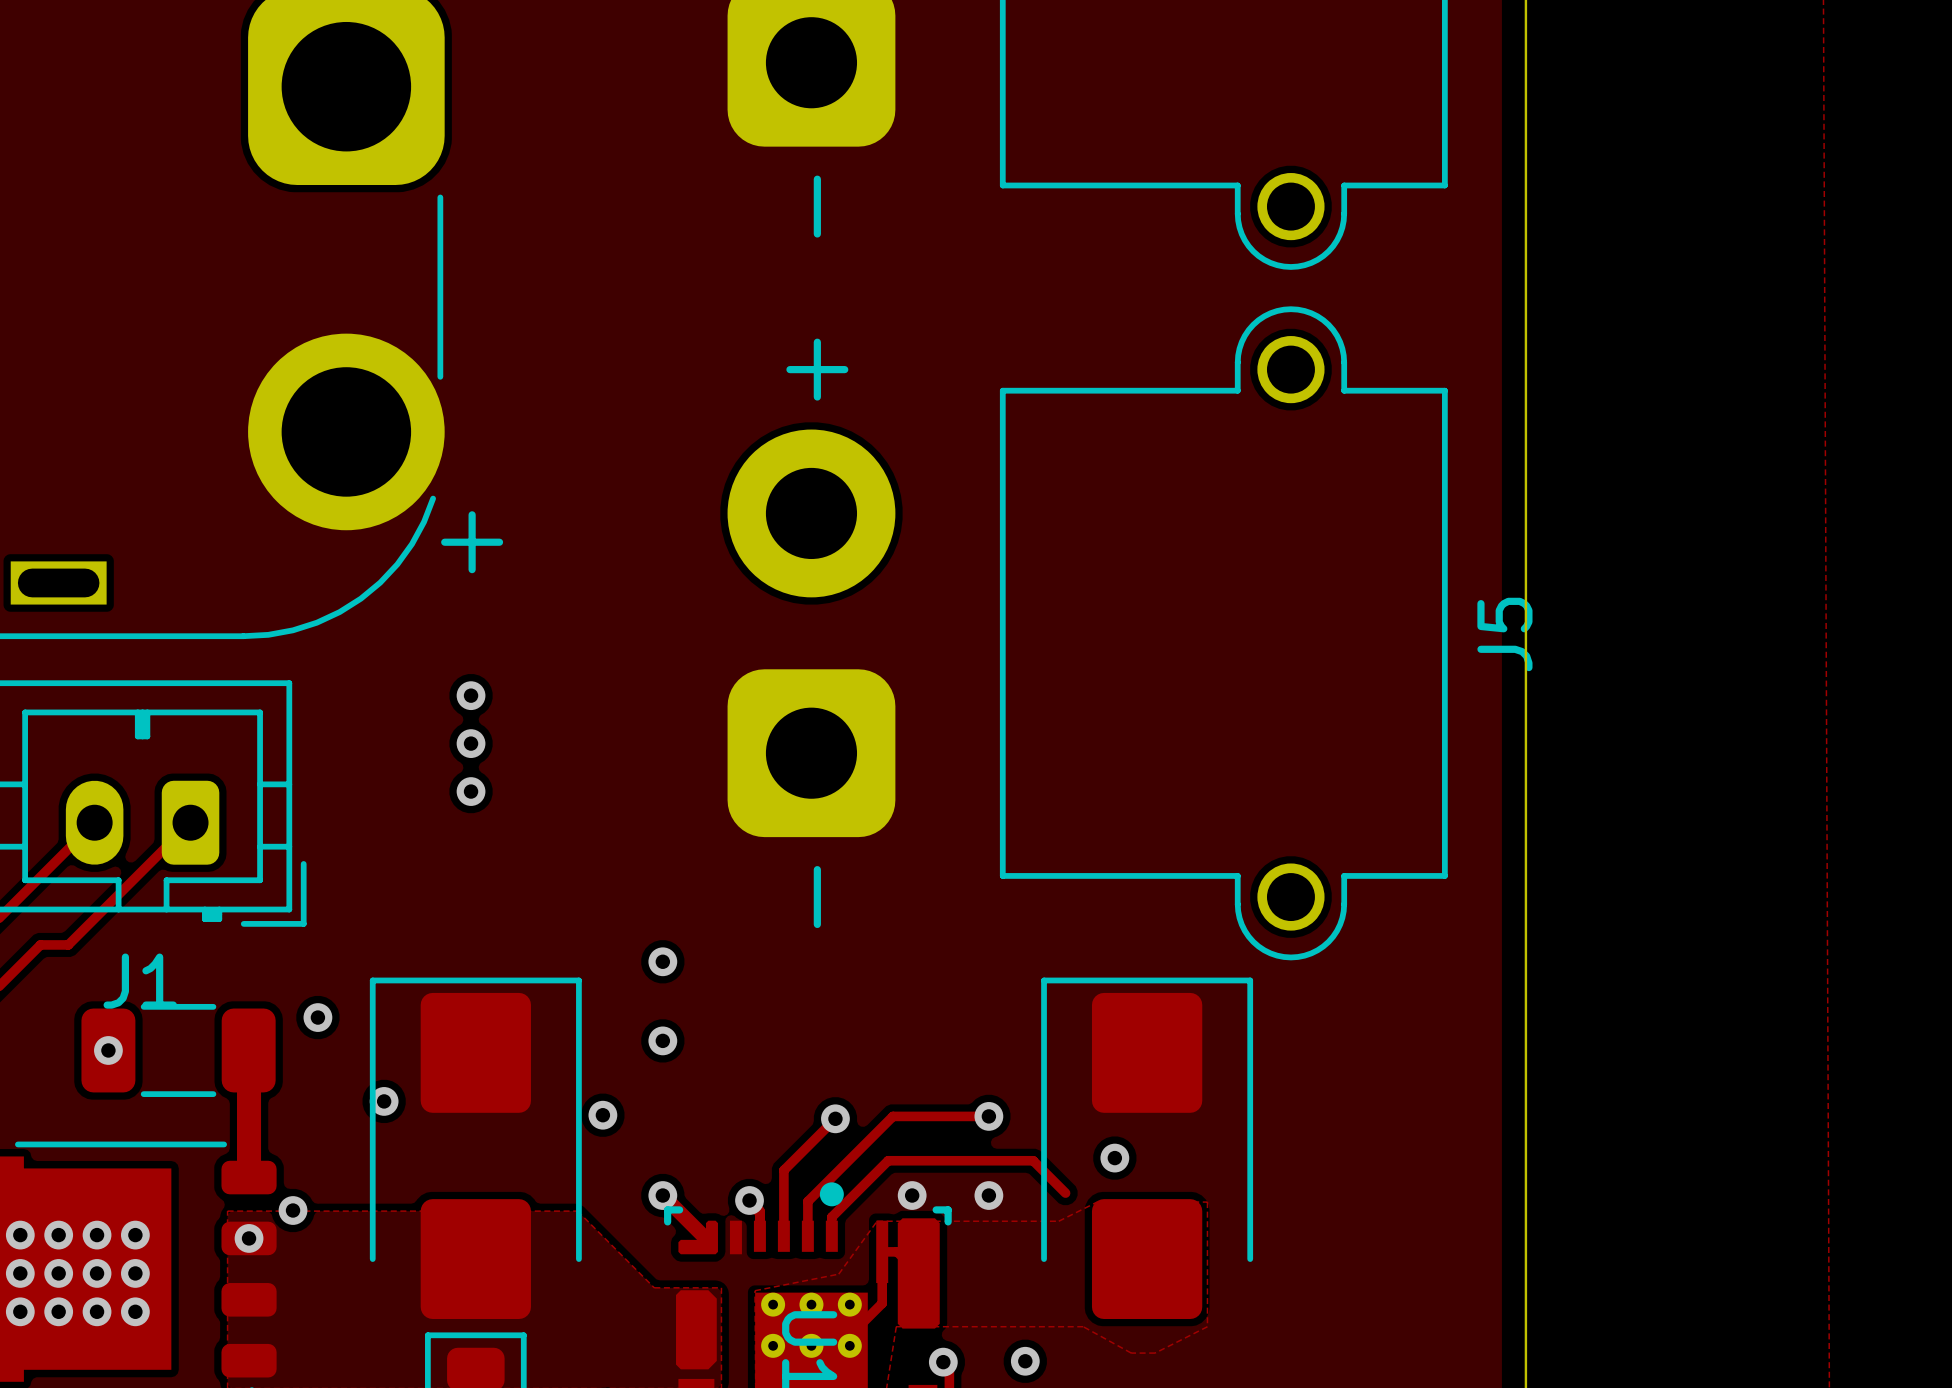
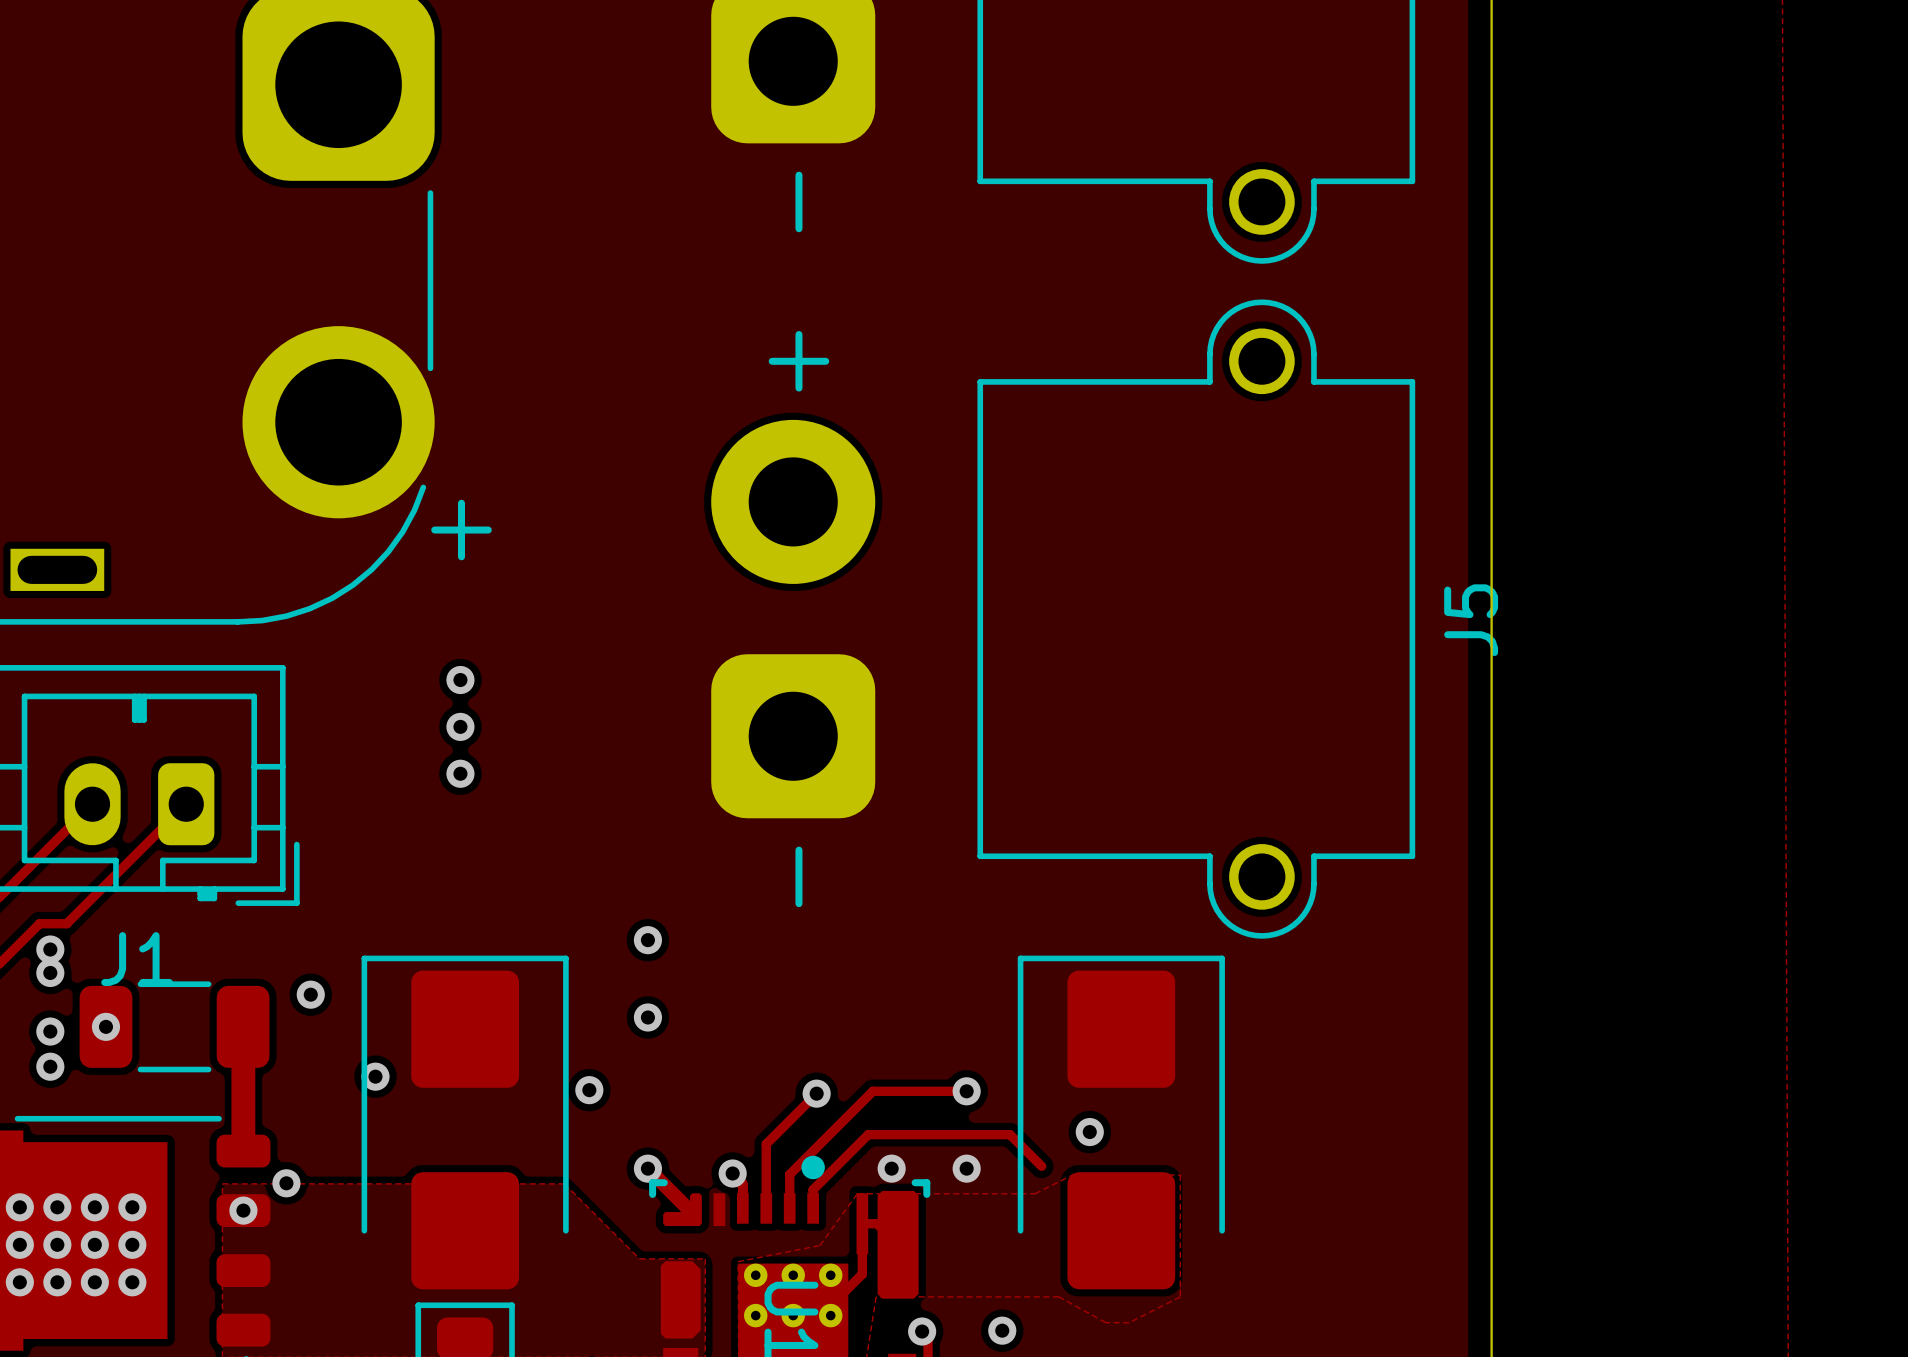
via: none -> (50, 949)
via: none -> (50, 972)
via: none -> (50, 1031)
via: none -> (50, 1066)

